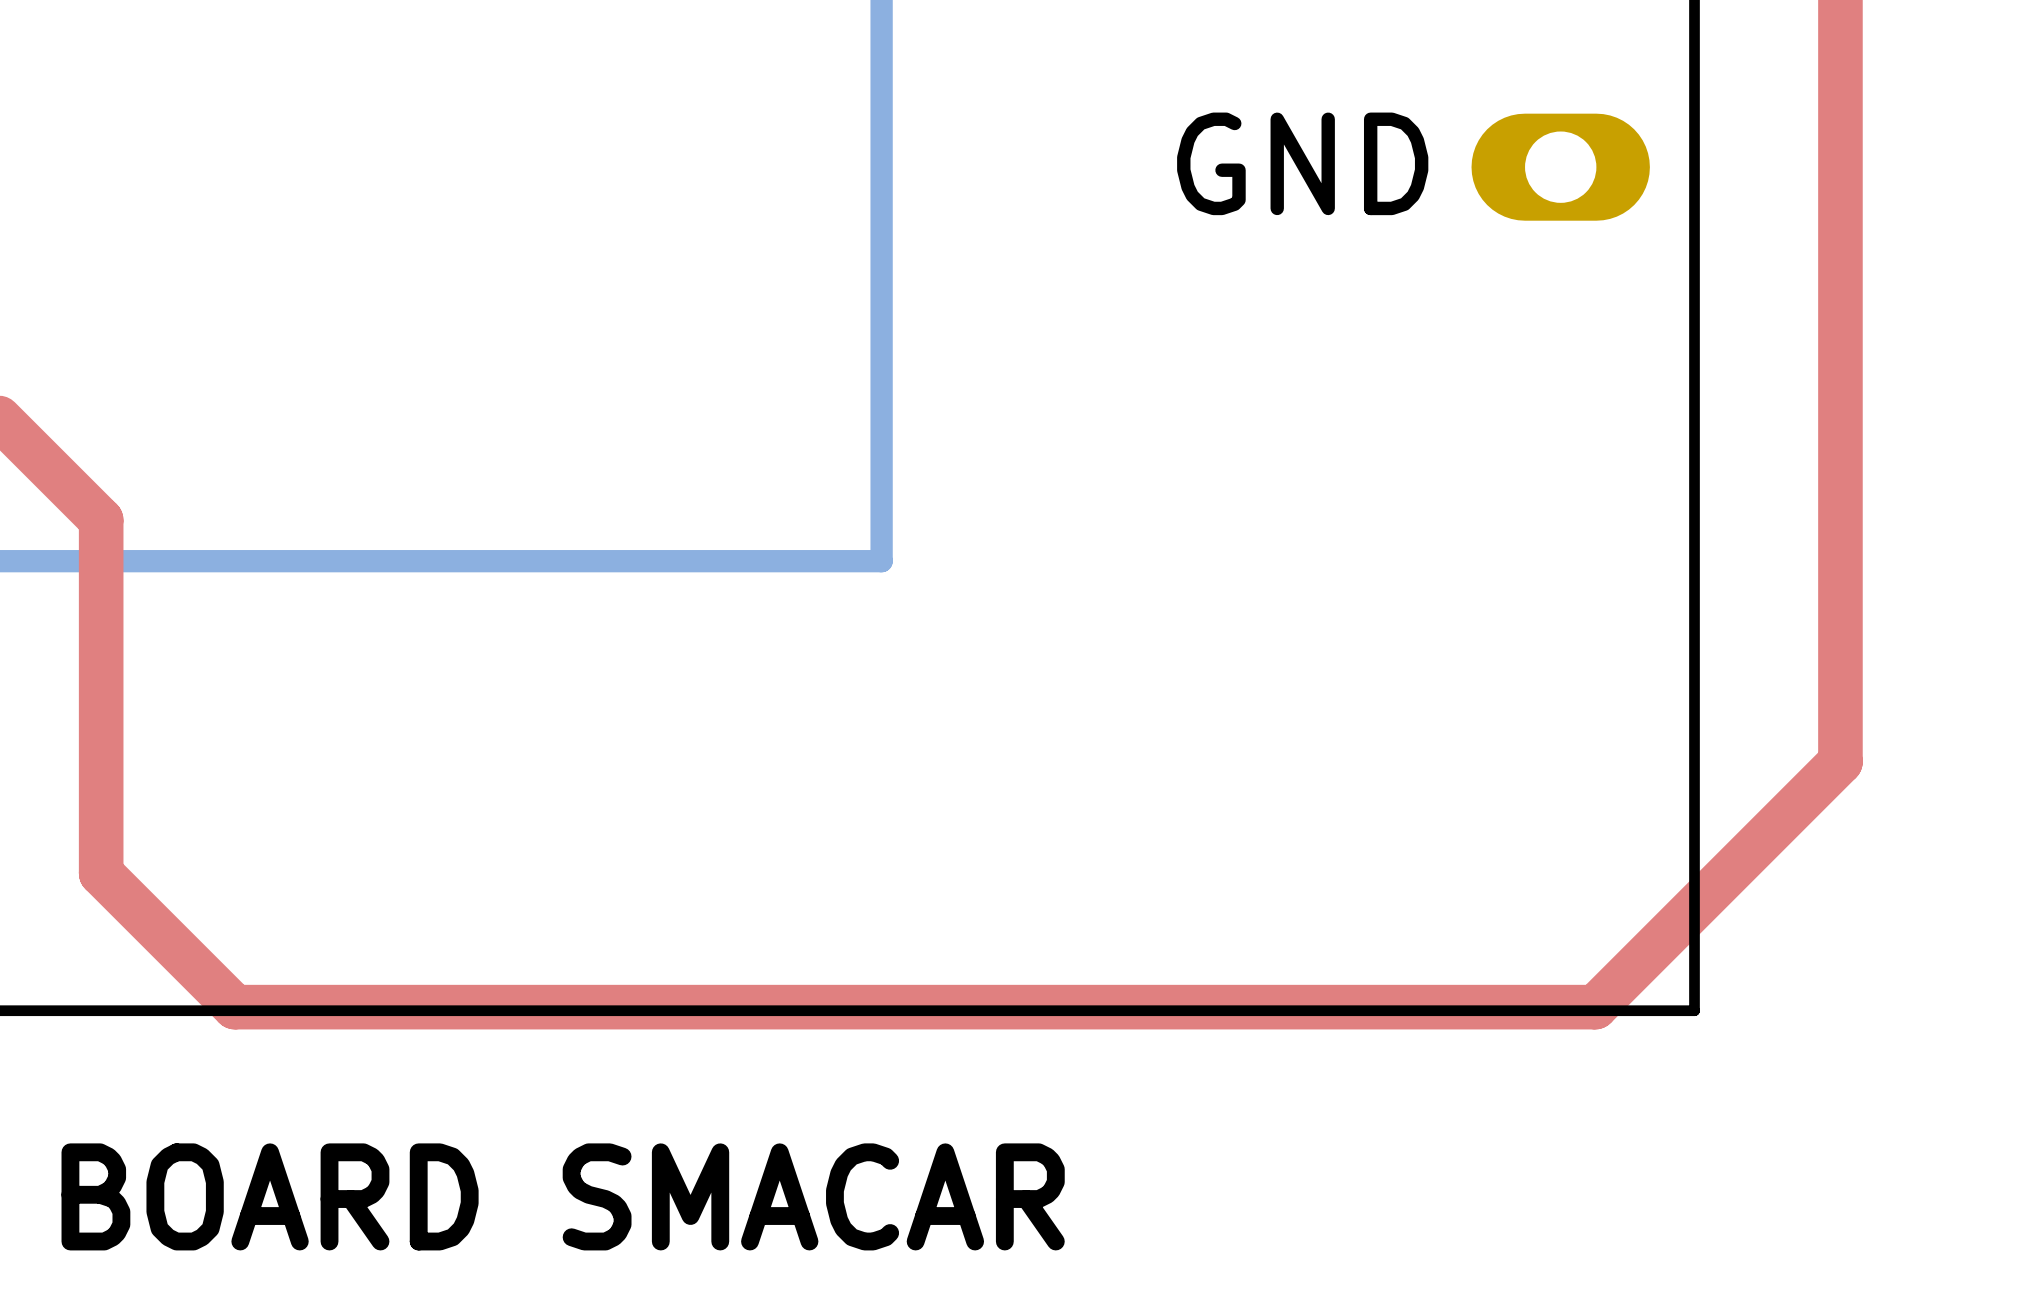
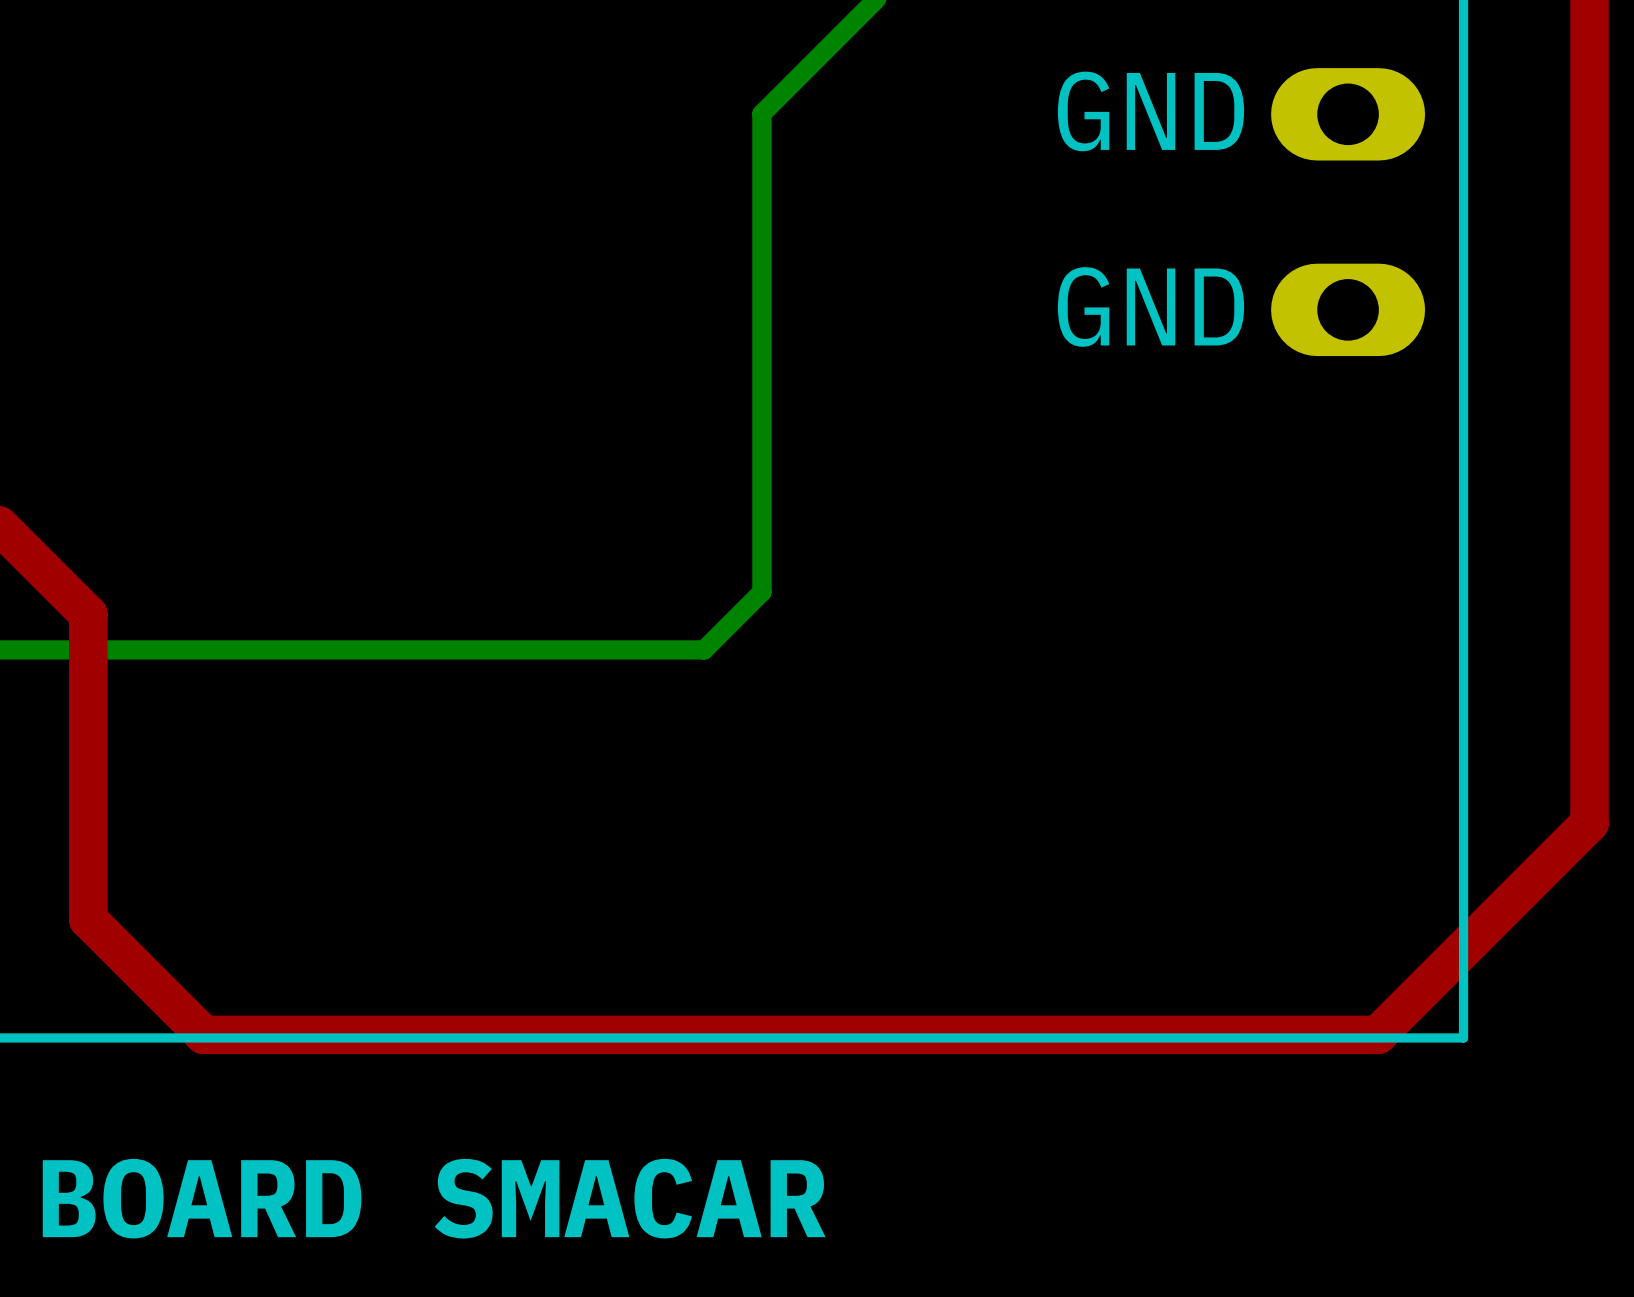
bottom track: (881, 494) (881, 561) (814, 561) -> (761, 592) (704, 649)

